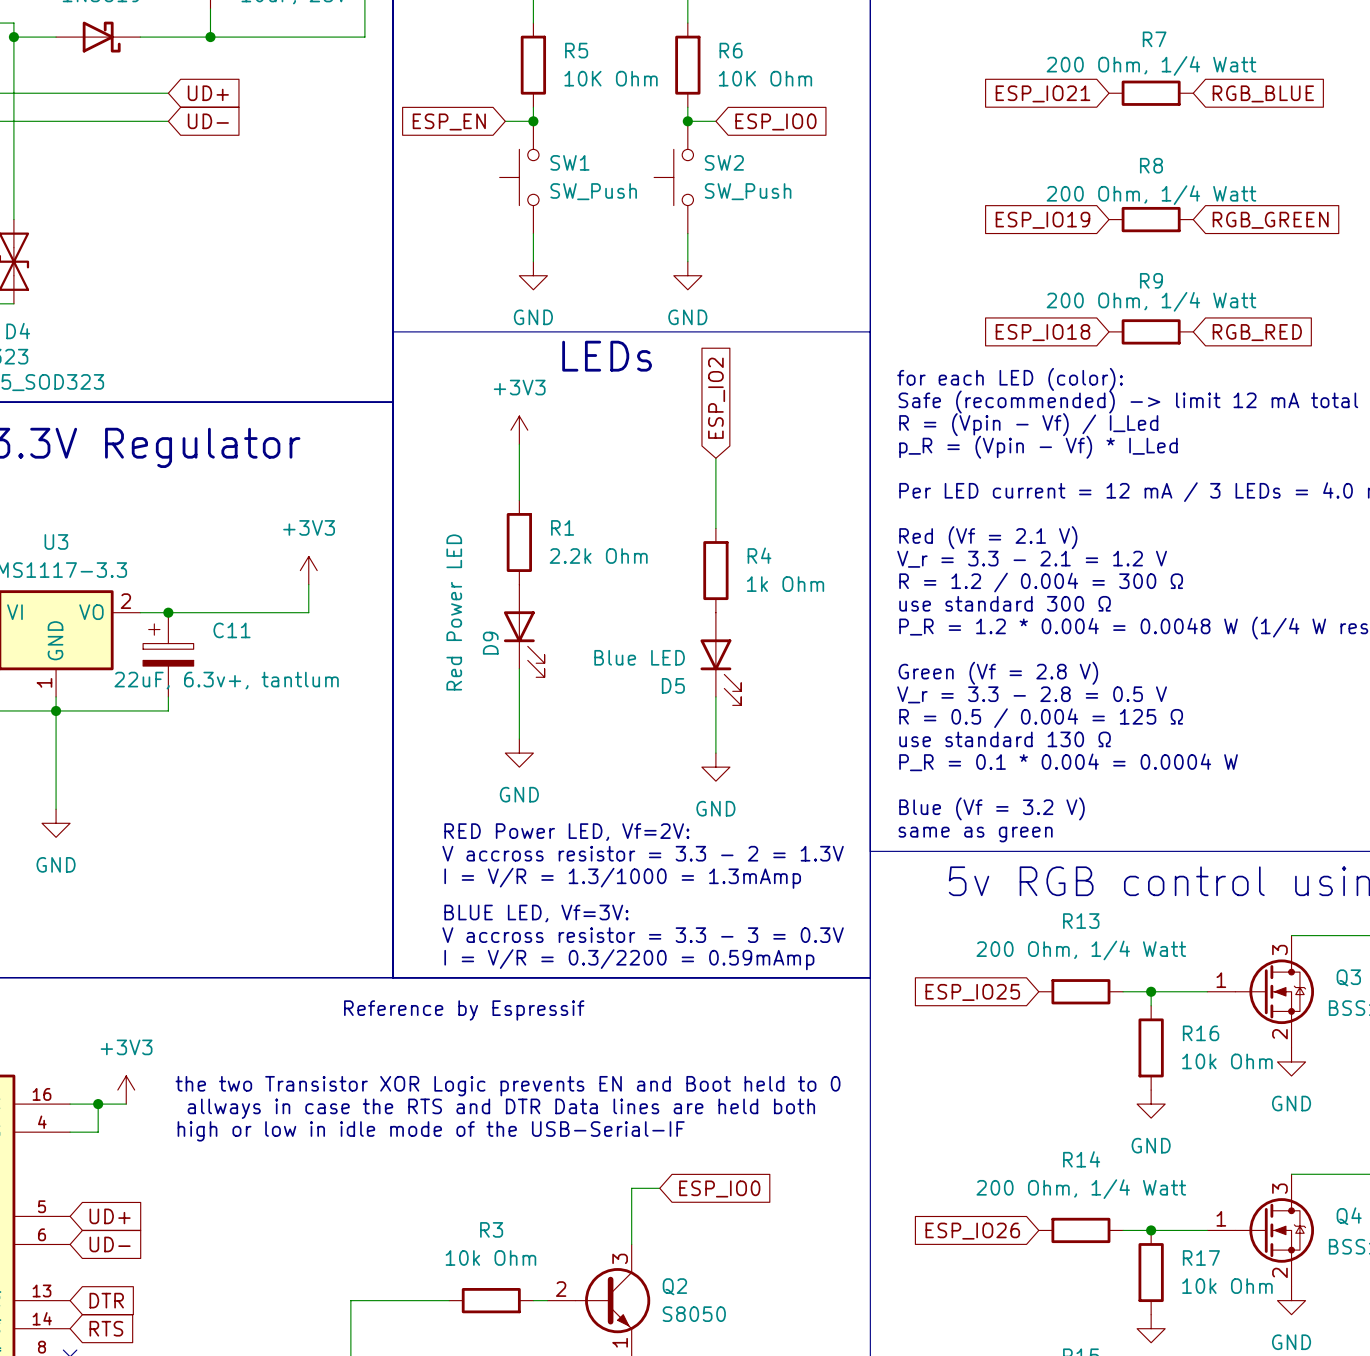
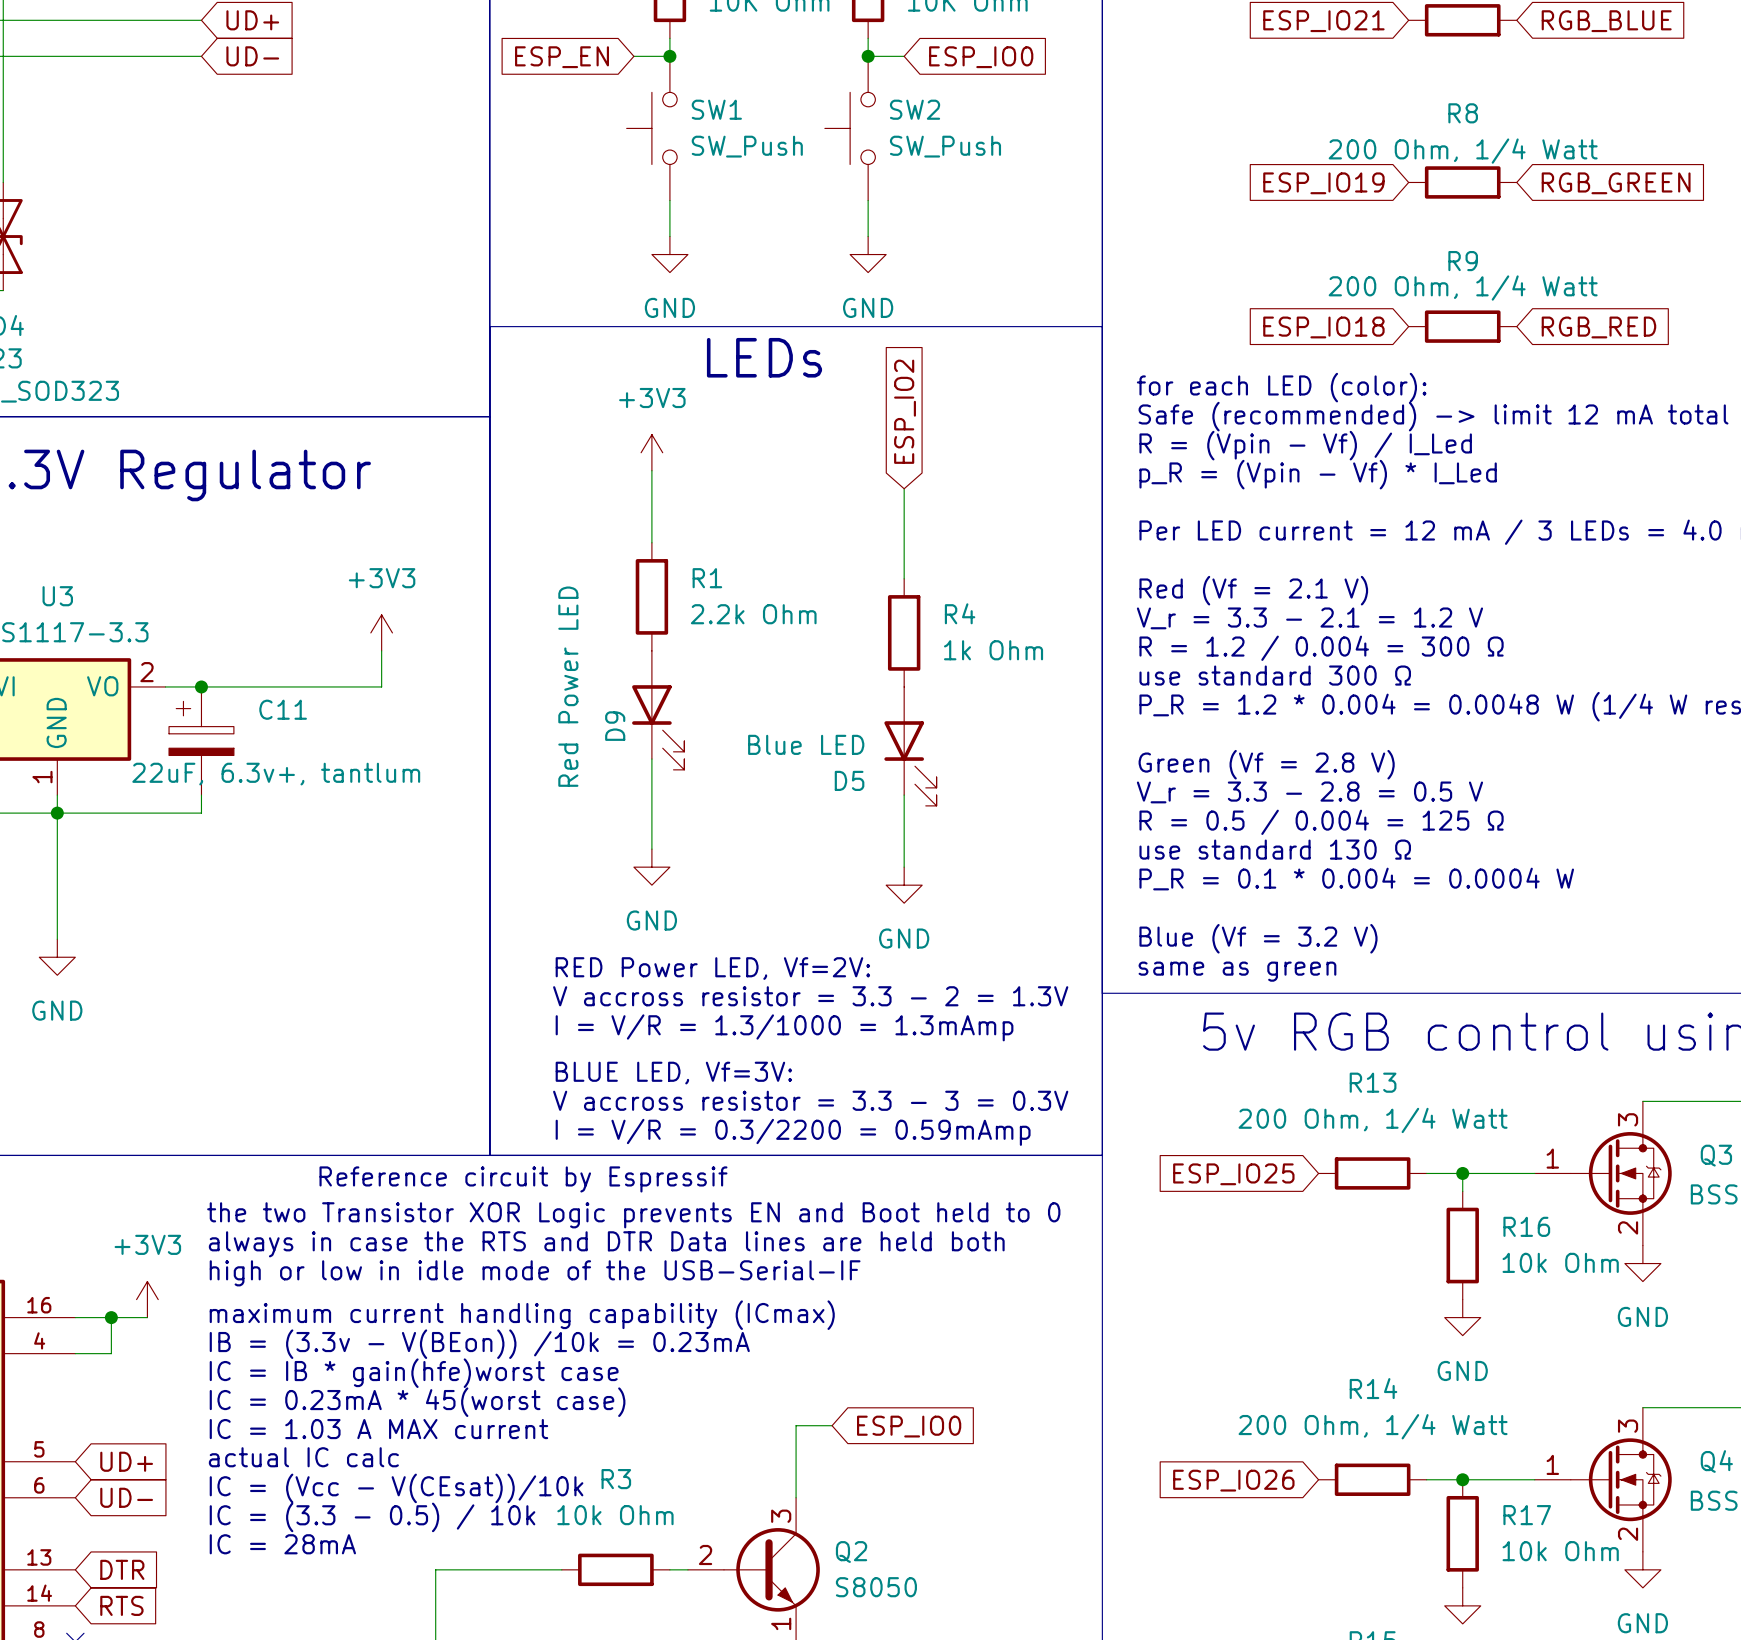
text: Reference by Espressif (464, 1010) -> Reference circuit by Espressif (523, 1179)
text: none -> always in case the RTS and DTR Data lines are held both (606, 1244)
text position: the two Transistor XOR Logic prevents EN and Boot held to 0 (508, 1086) -> the two Transistor XOR Logic prevents EN and Boot held to 0 (633, 1215)
text: allways in case the RTS and DTR Data lines are held both (501, 1108) -> maximum current handling capability (ICmax) (522, 1315)
text: none -> IB = (3.3v - V(BEon)) /10k = 0.23mA (479, 1344)
text position: high or low in idle mode of the USB-Serial-IF (431, 1131) -> high or low in idle mode of the USB-Serial-IF (535, 1273)
text: none -> IC = IB * gain(hfe)worst case (414, 1373)
text: none -> IC = 0.23mA * 45(worst case) (417, 1402)
text: none -> IC = 1.03 A MAX current (378, 1429)
text: none -> actual IC calc (303, 1457)
text: none -> IC = (Vcc - V(CEsat))/10k (396, 1488)
text: none -> IC = (3.3 - 0.5) / 10k (372, 1517)
text: none -> IC = 28mA (282, 1544)

